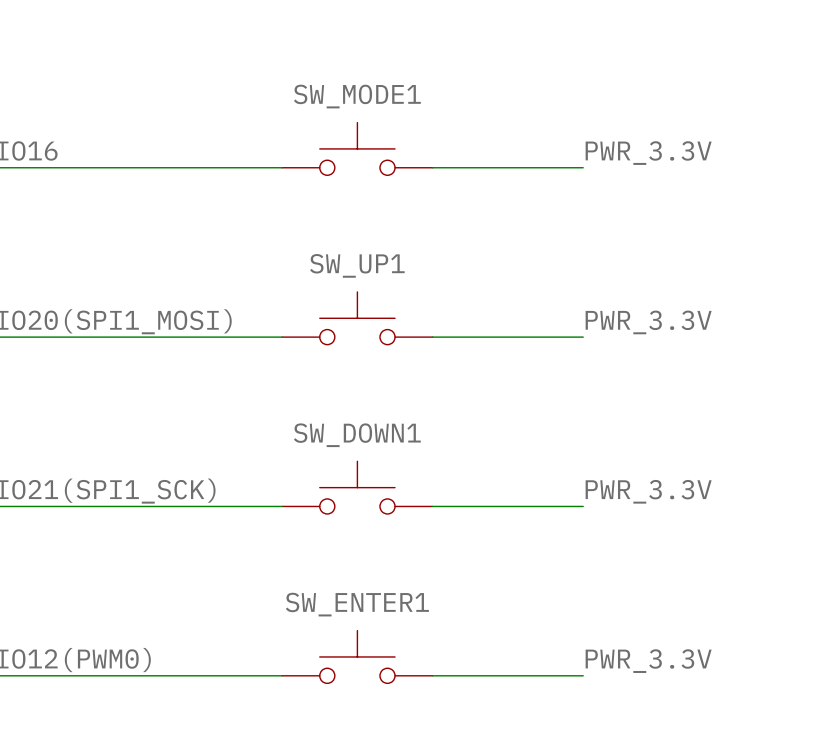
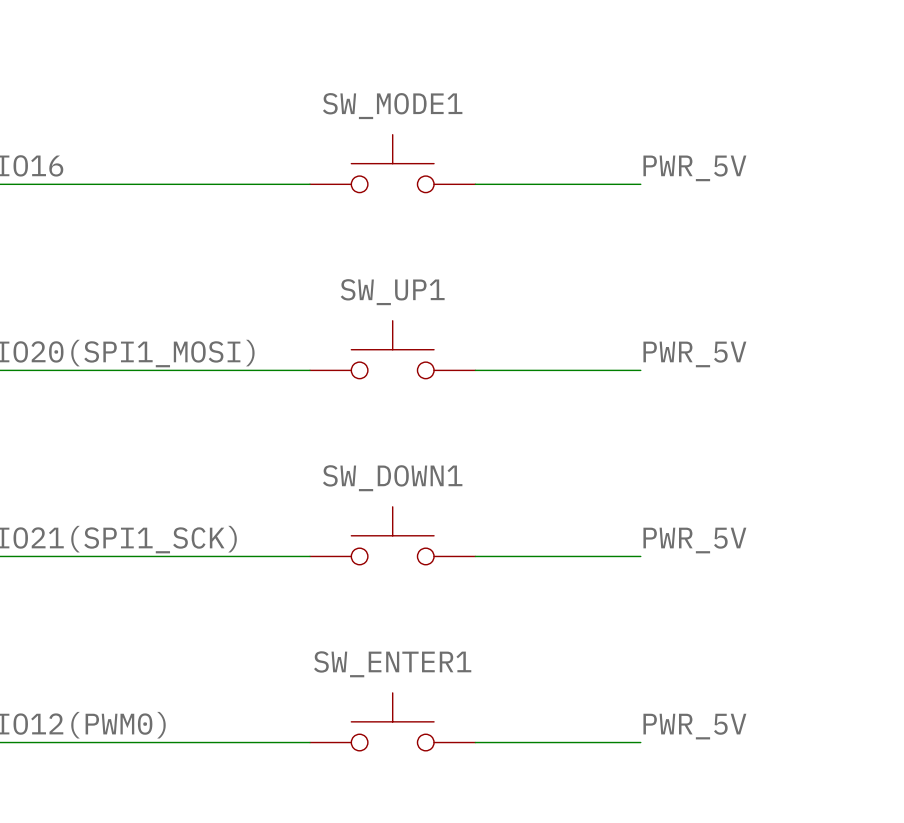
label: PWR_3.3V (648, 153) -> PWR_5V (694, 168)
label: PWR_3.3V (648, 322) -> PWR_5V (694, 354)
label: PWR_3.3V (648, 491) -> PWR_5V (694, 540)
label: PWR_3.3V (648, 661) -> PWR_5V (694, 726)

